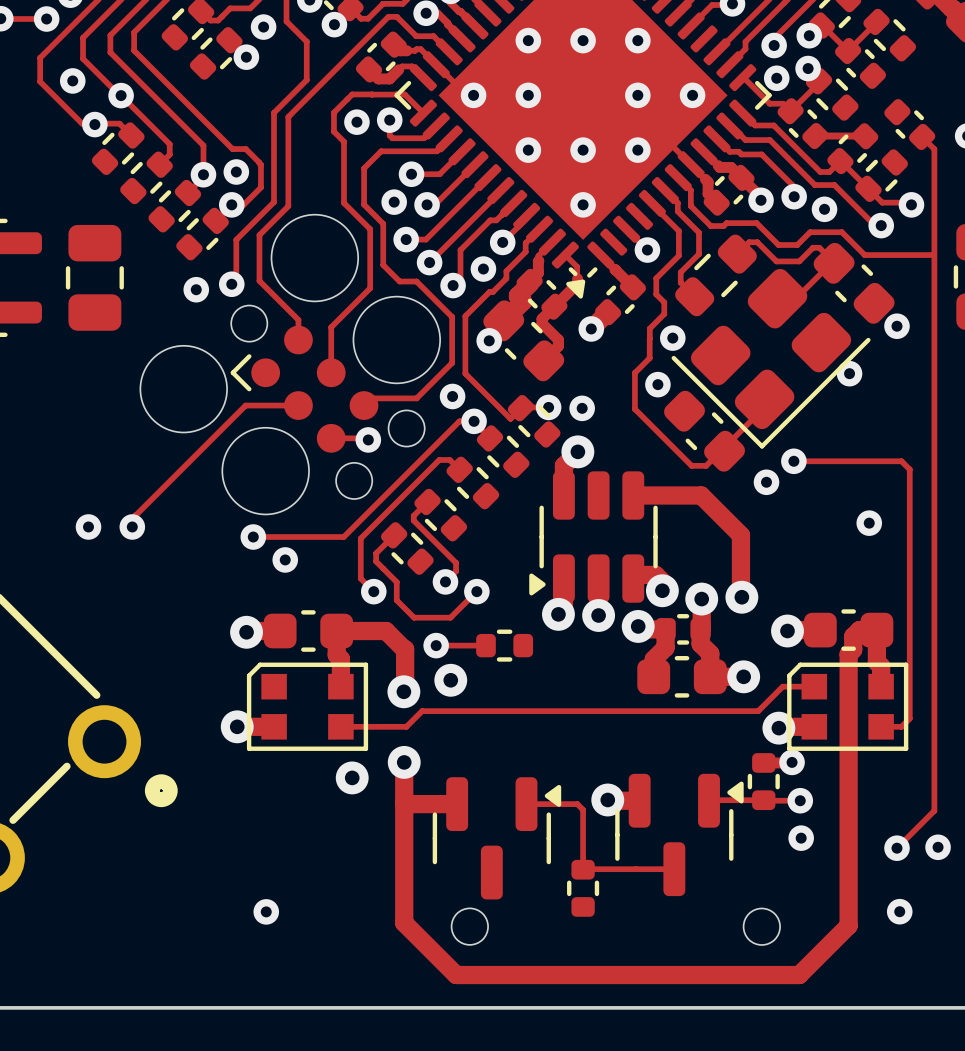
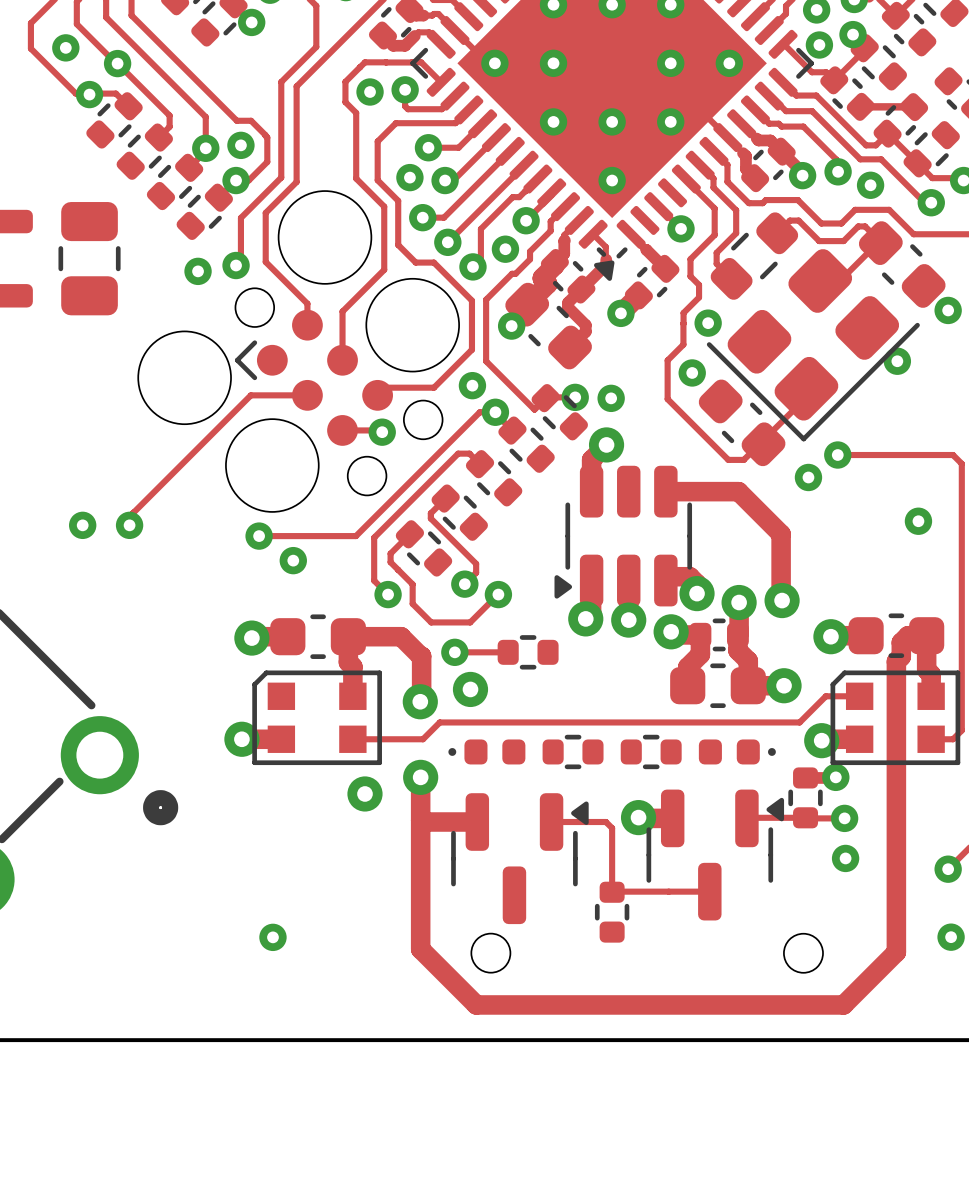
part: none -> (486, 751)
part: none -> (573, 751)
part: none -> (651, 751)
part: none -> (737, 751)

